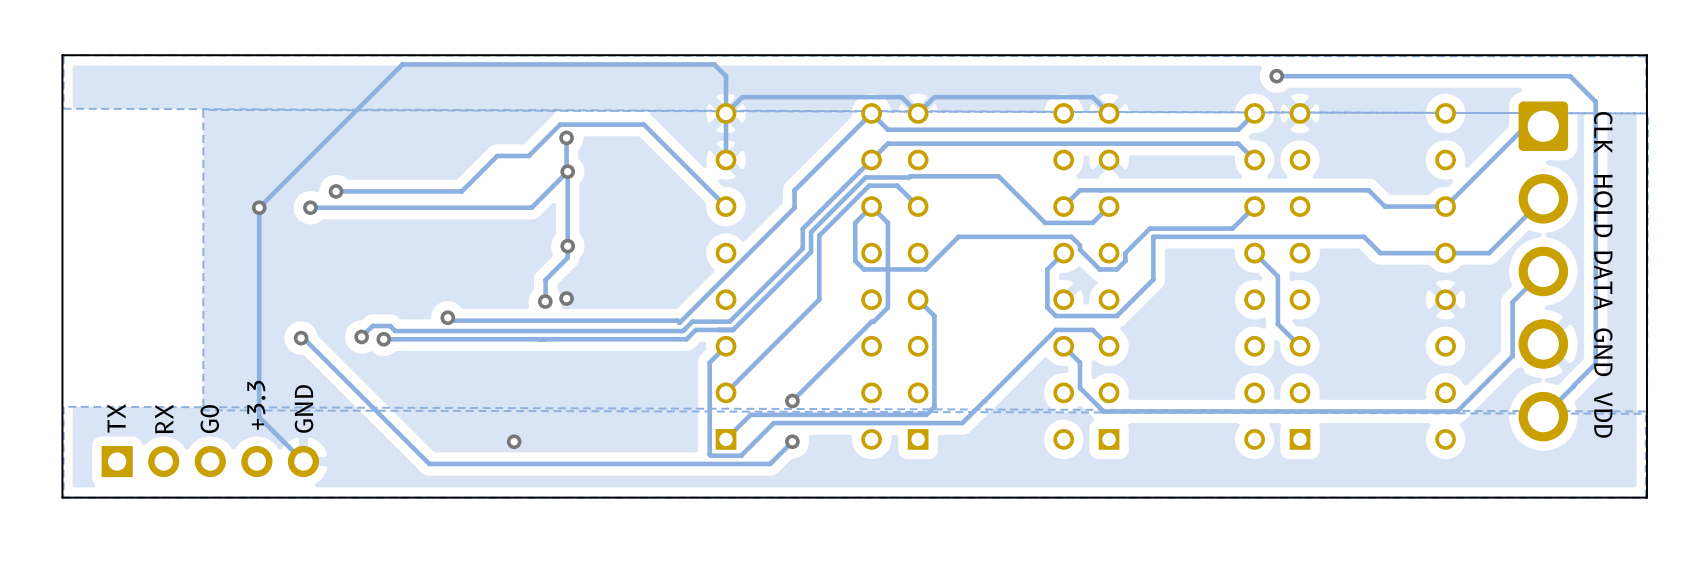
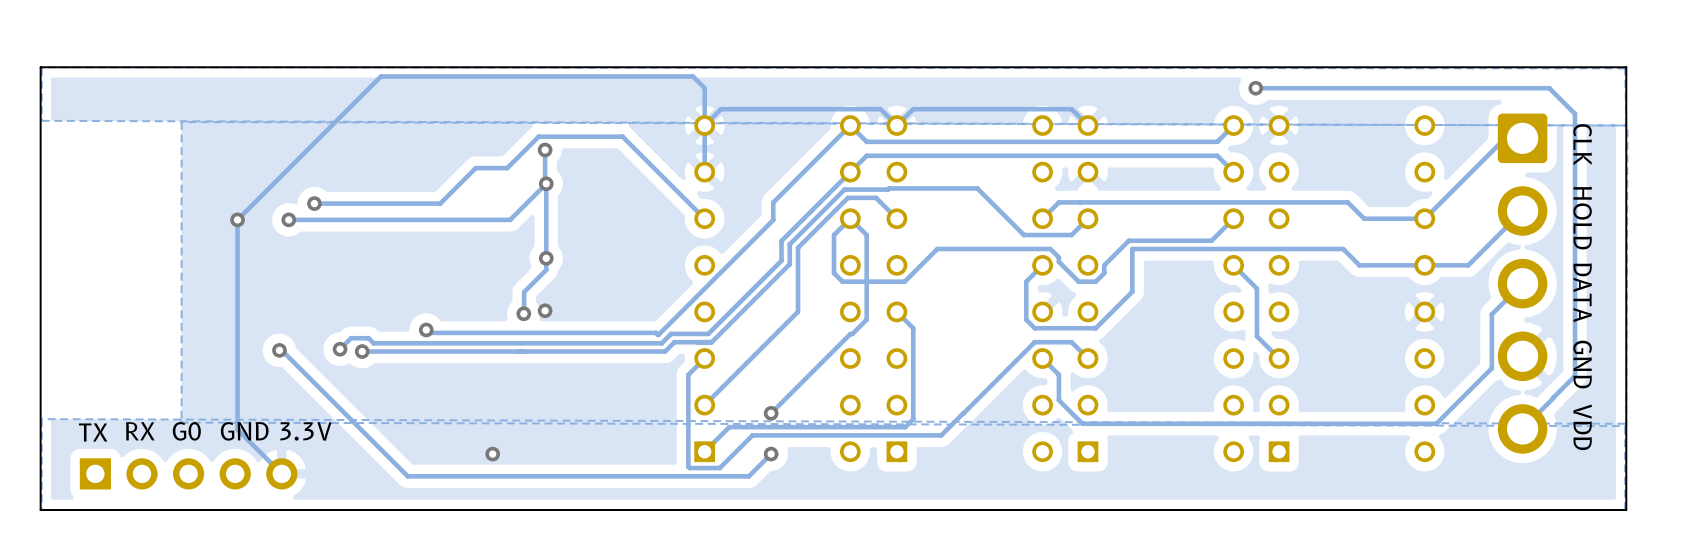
text: +3.3 (256, 405) -> GND (244, 431)
text: GND (304, 408) -> none
text rotation: 0° (116, 418) -> 90° clockwise (93, 432)
text rotation: 0° (164, 419) -> 90° clockwise (140, 431)
text rotation: 0° (209, 419) -> 90° clockwise (186, 431)
text: none -> 3.3V (305, 431)

